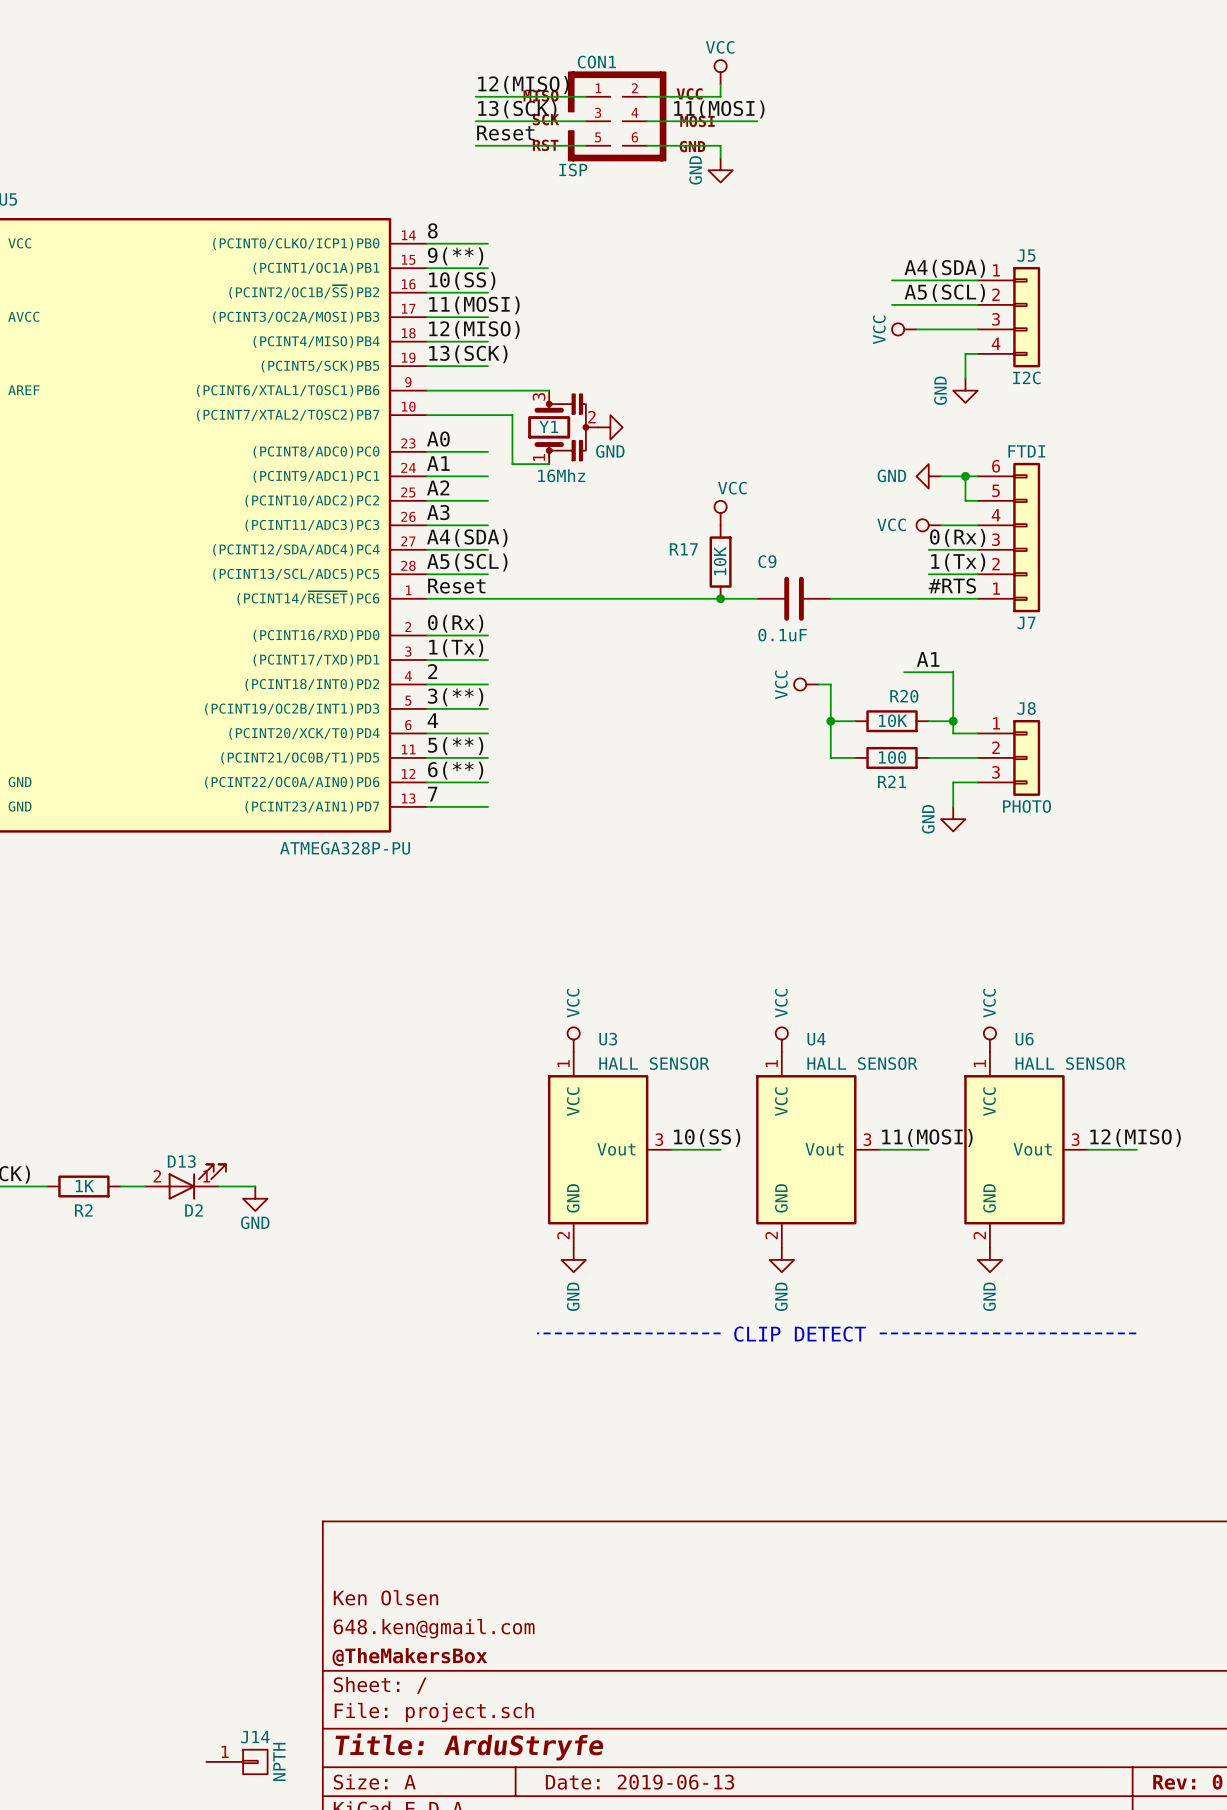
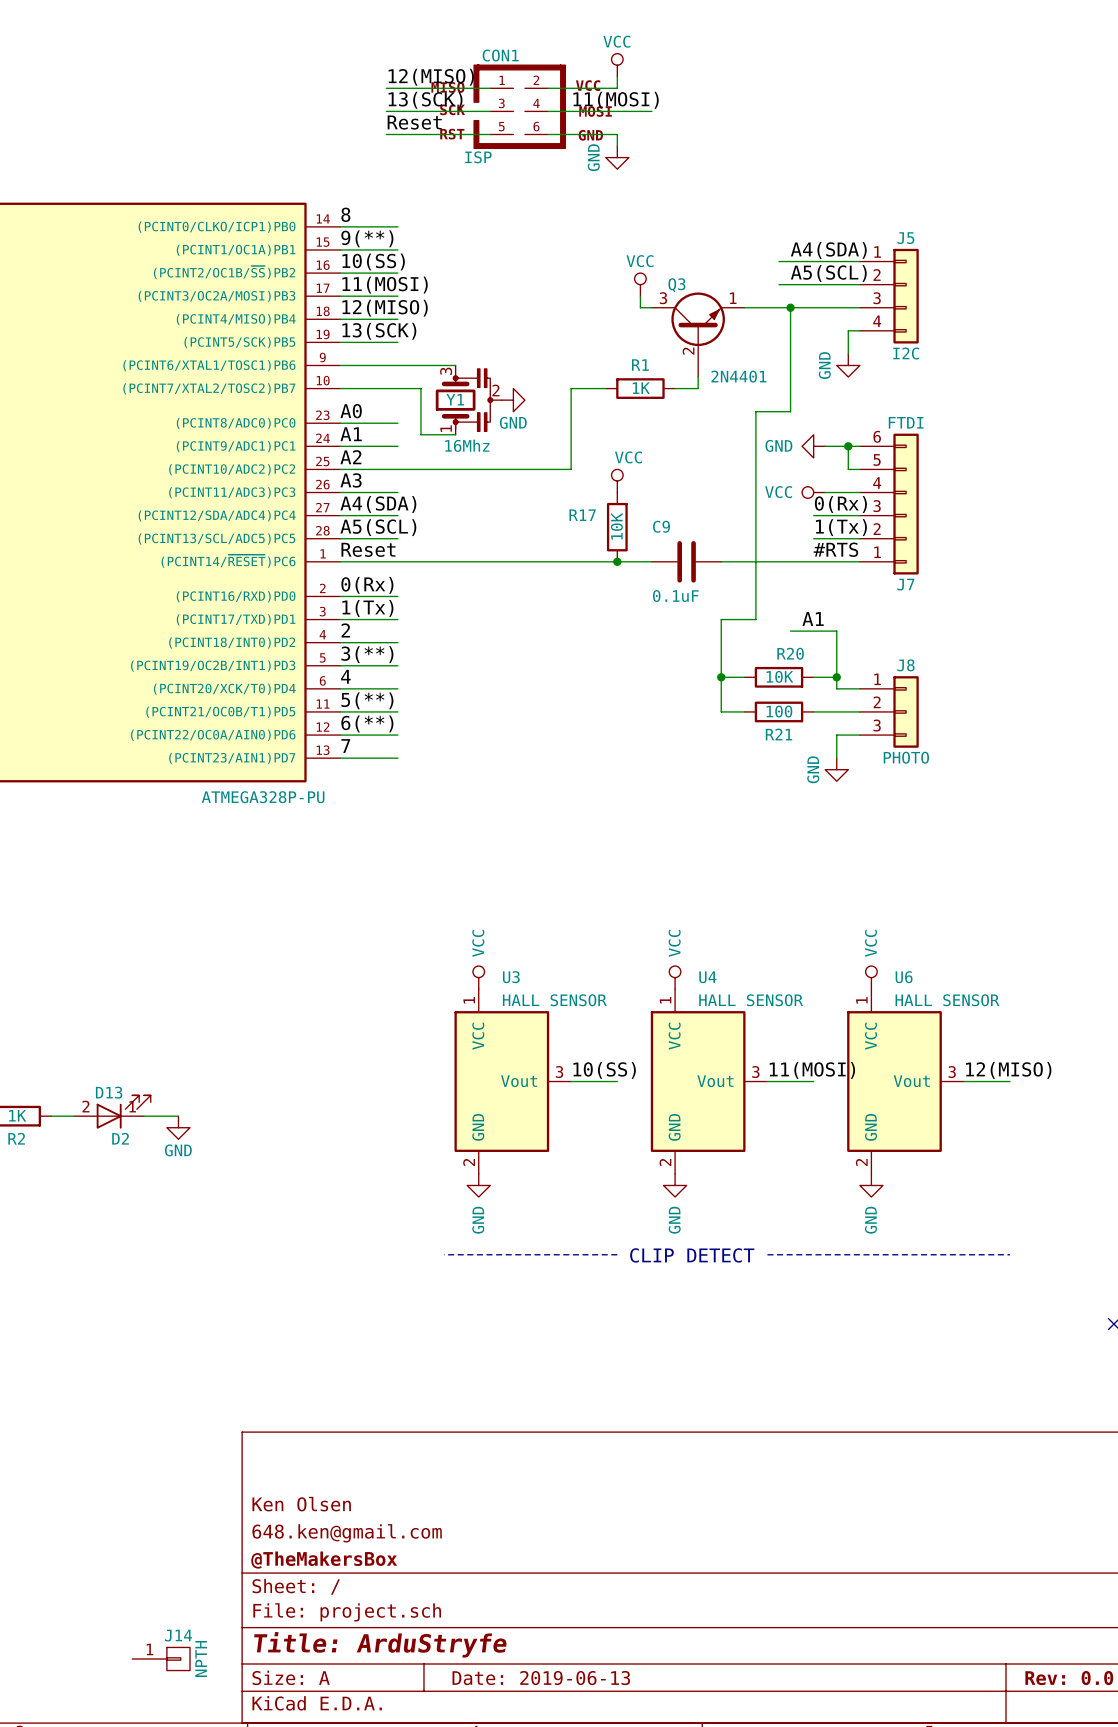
wire: none -> (640, 296) (640, 307) (651, 307)
wire: none -> (744, 307) (802, 307)
power symbol rotation: 0° (904, 329) -> 90° clockwise (640, 284)
power symbol position: VCC (904, 329) -> VCC (640, 284)
junction: none -> (790, 307)
Q3: none -> 2N4401 (698, 334)
wire: none -> (698, 377) (698, 388) (675, 388)
wire: none -> (605, 388) (571, 388) (571, 469) (397, 469)
R1: none -> 1K (640, 388)
power symbol: VCC (806, 684) -> none
wire: (818, 684) (830, 684) -> (790, 307) (790, 411) (755, 411) (755, 619) (721, 619) (721, 642)

